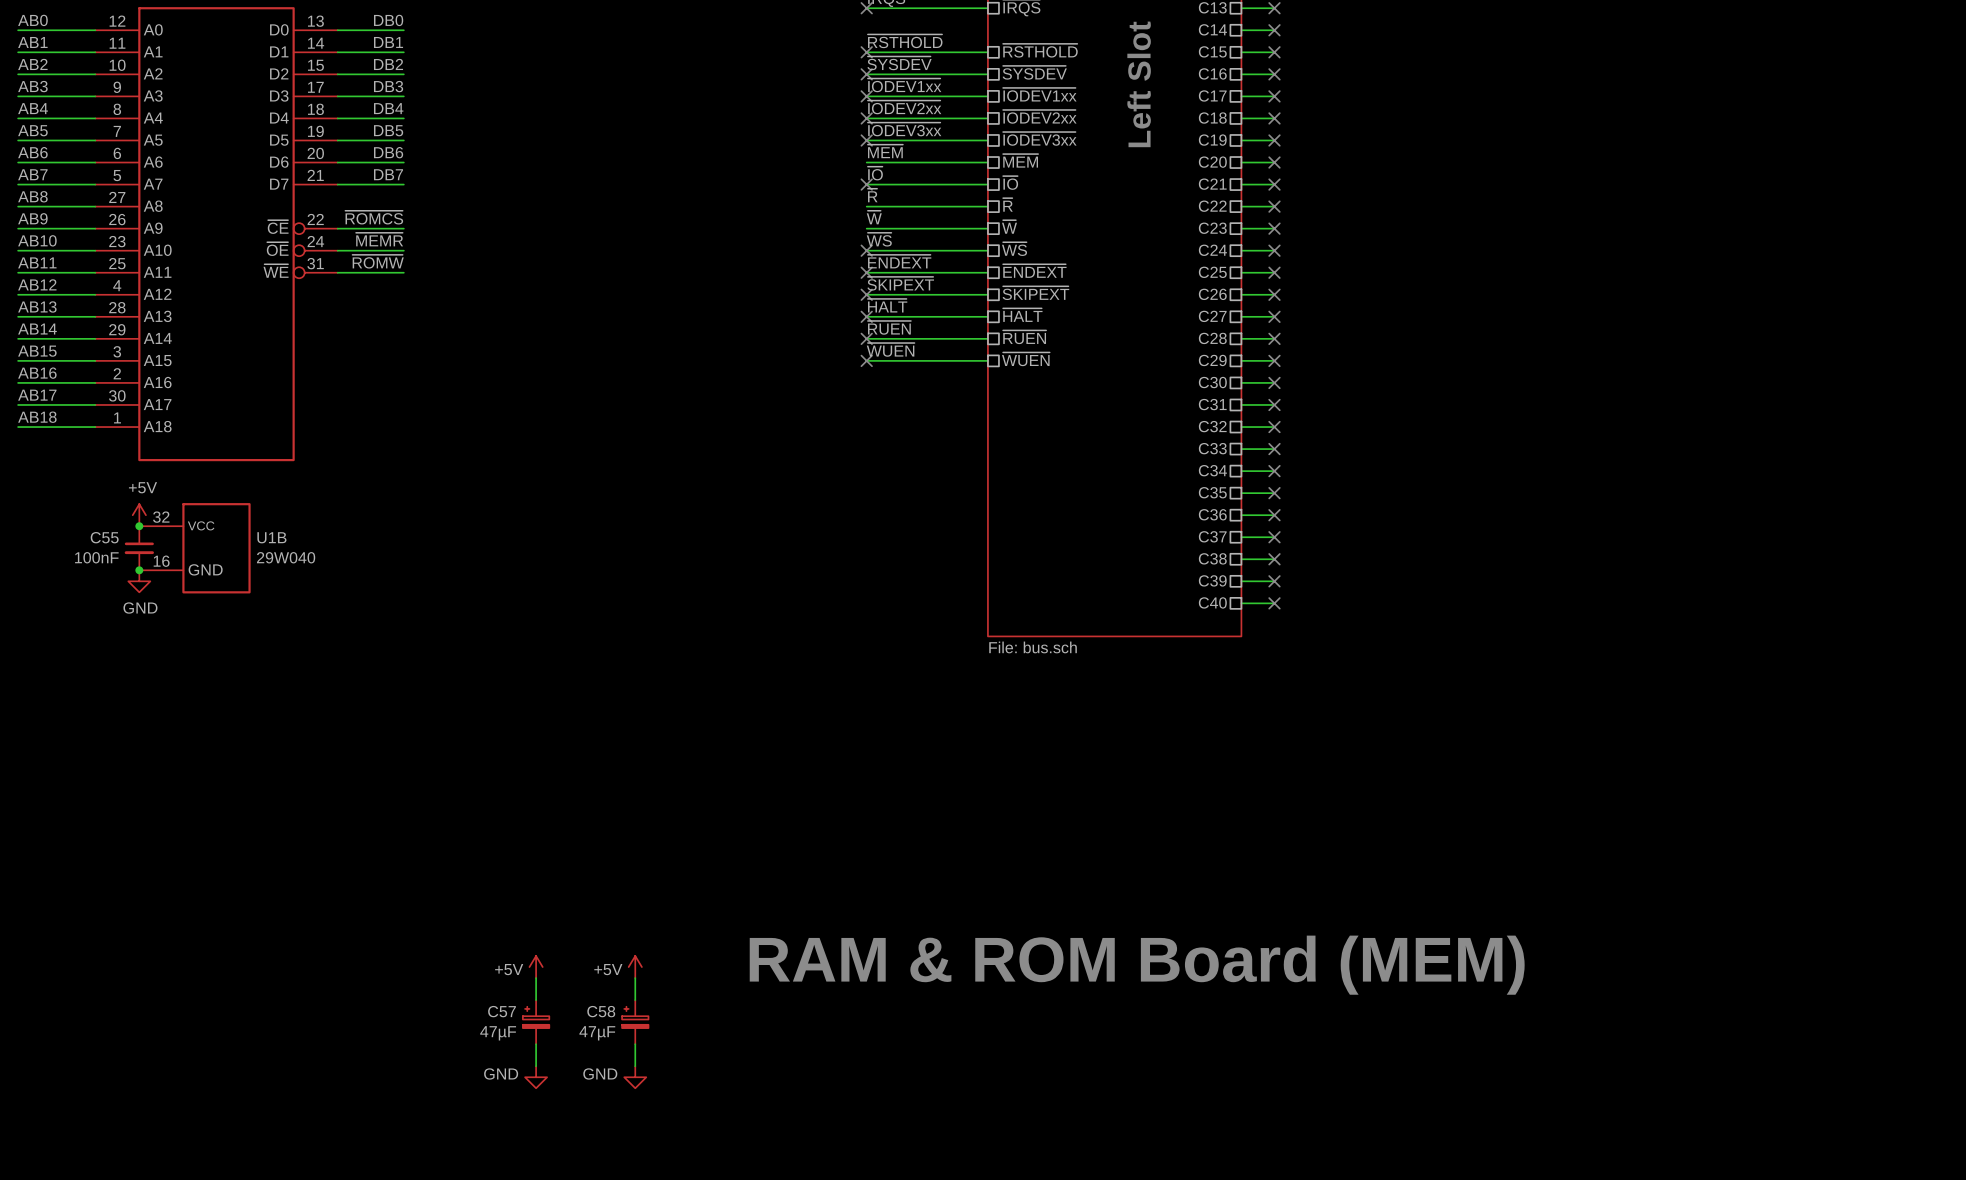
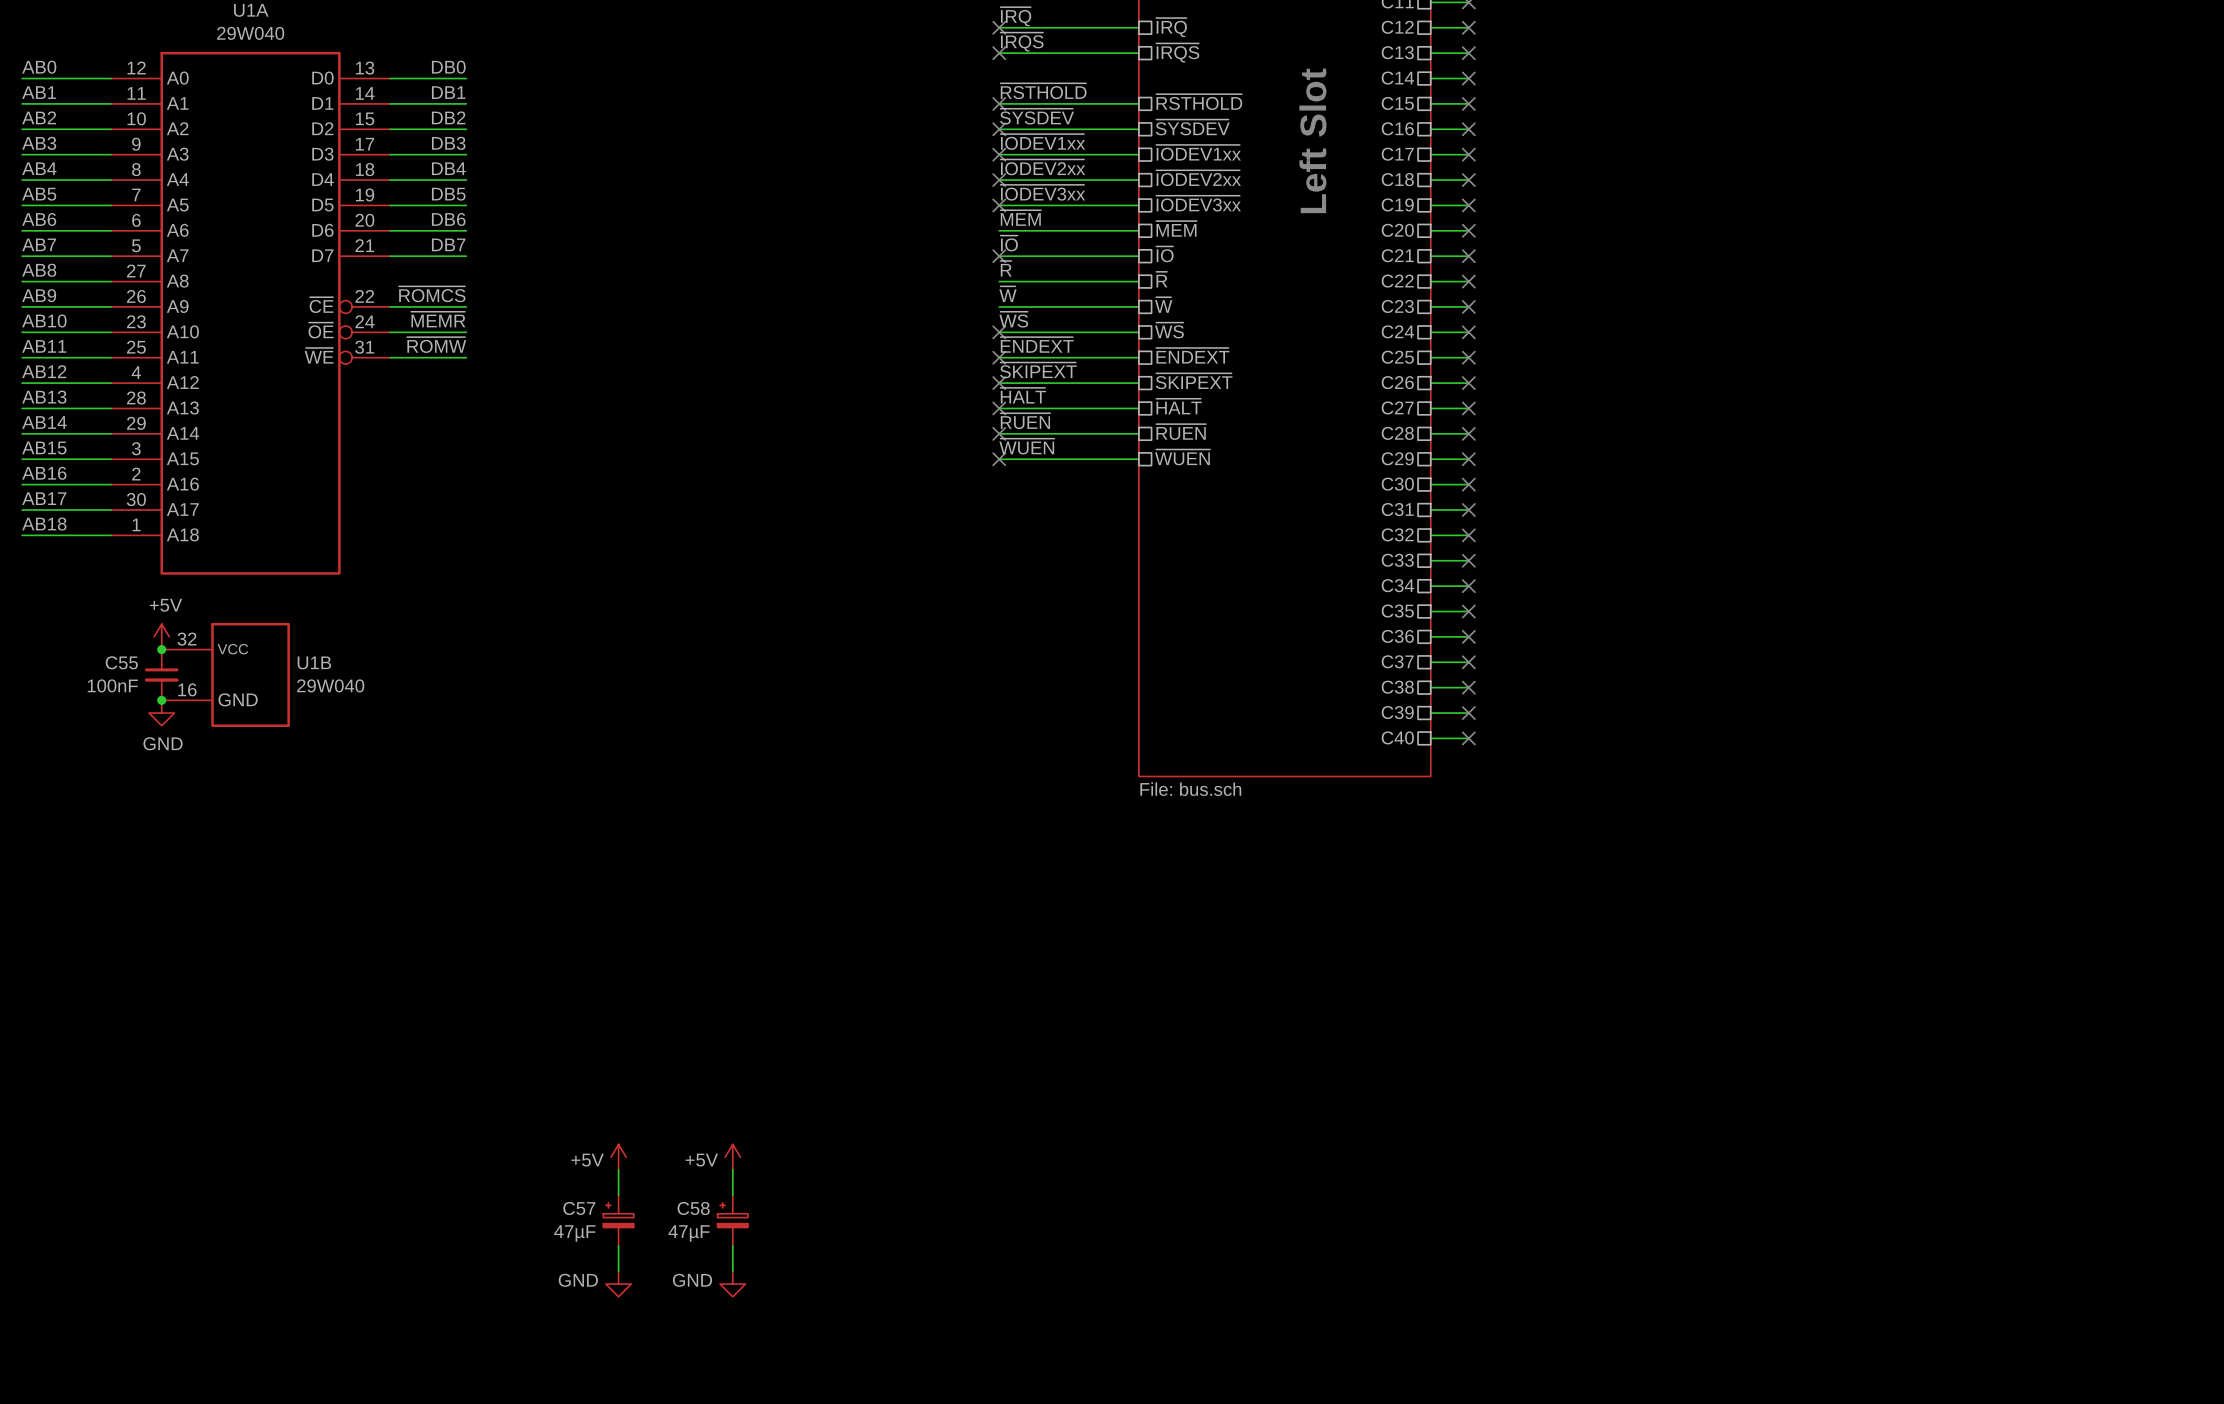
text: RAM & ROM Board (MEM) (1137, 965) -> none

